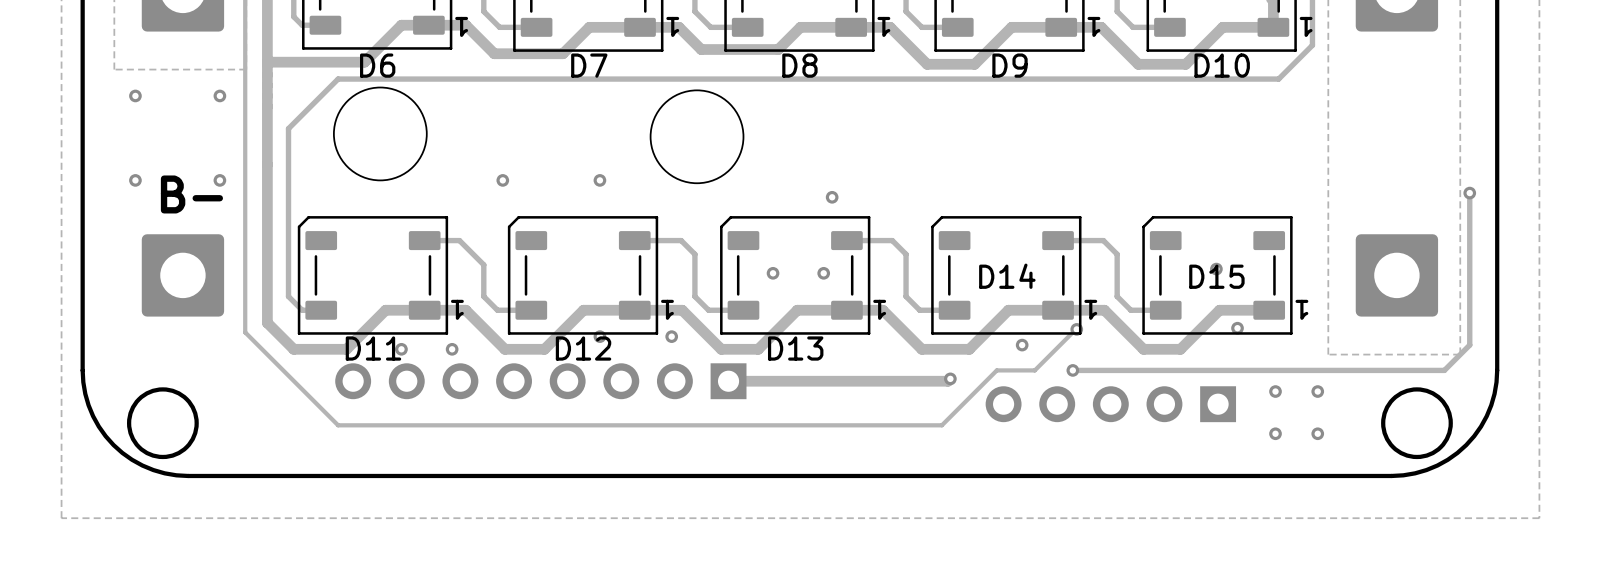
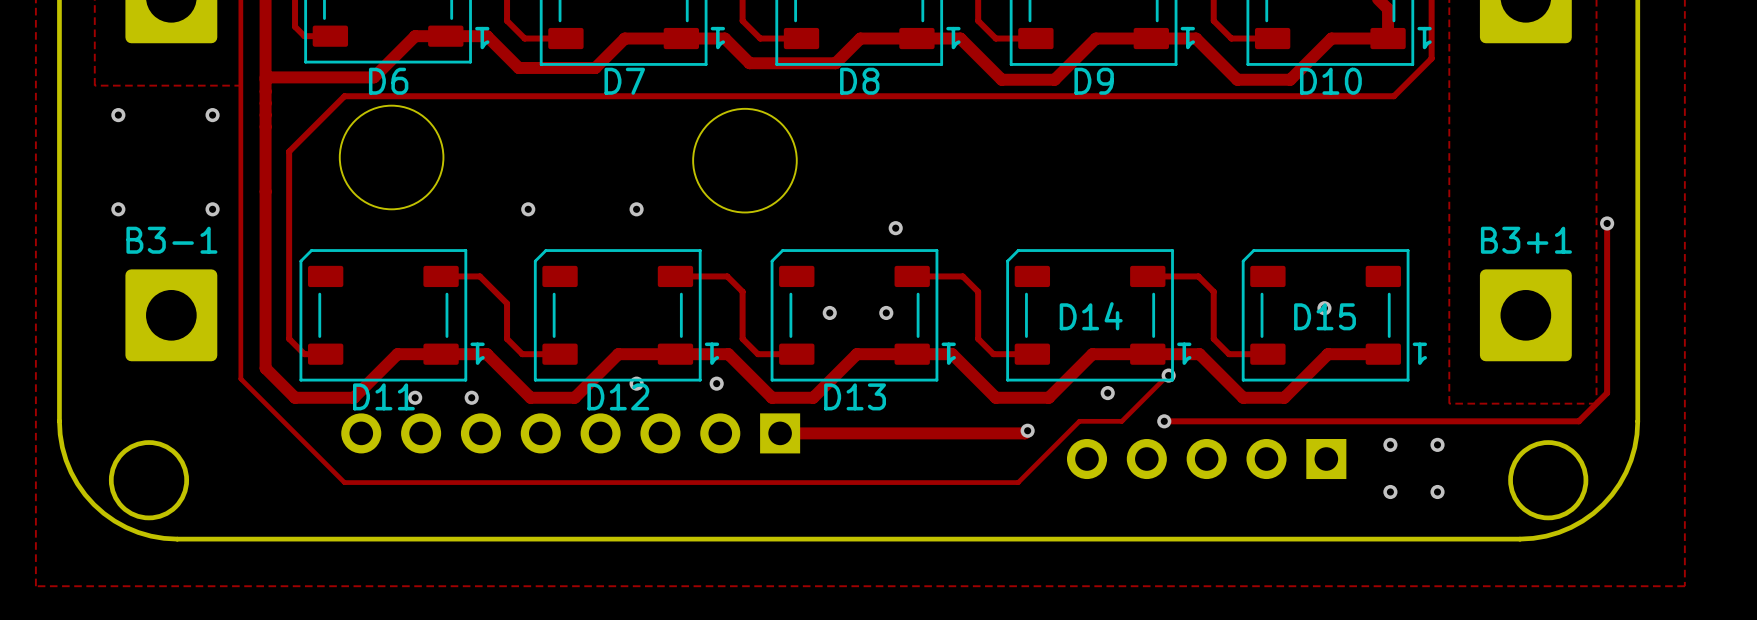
text: B- (191, 194) -> none
B3-1 name: none -> B3-1 (171, 240)
B3+1 name: none -> B3+1 (1526, 240)
via: (1237, 328) -> none

